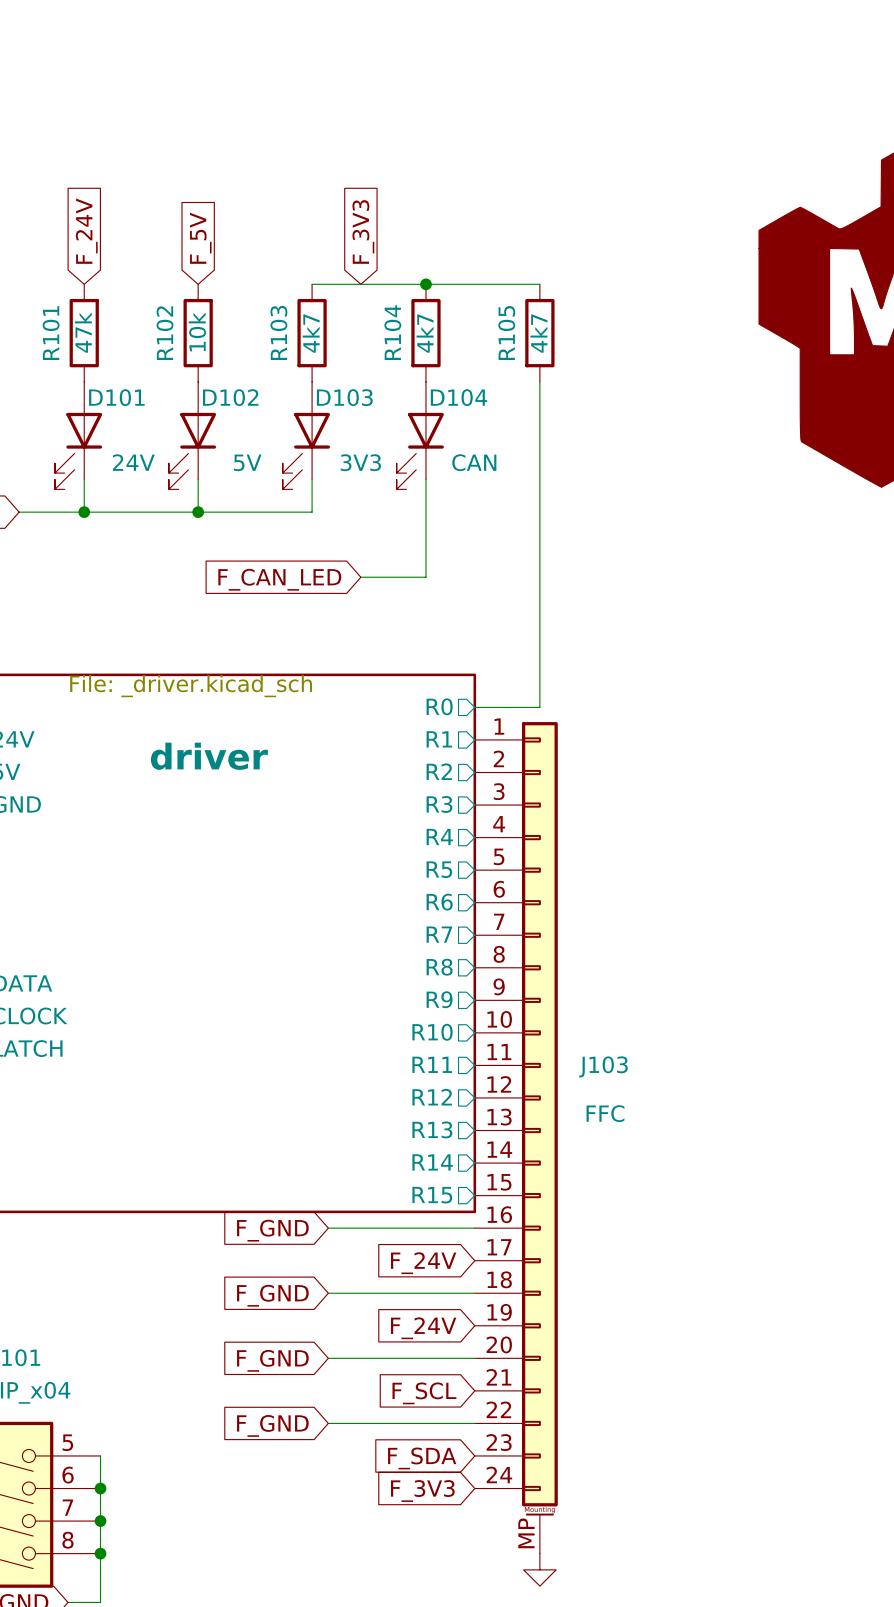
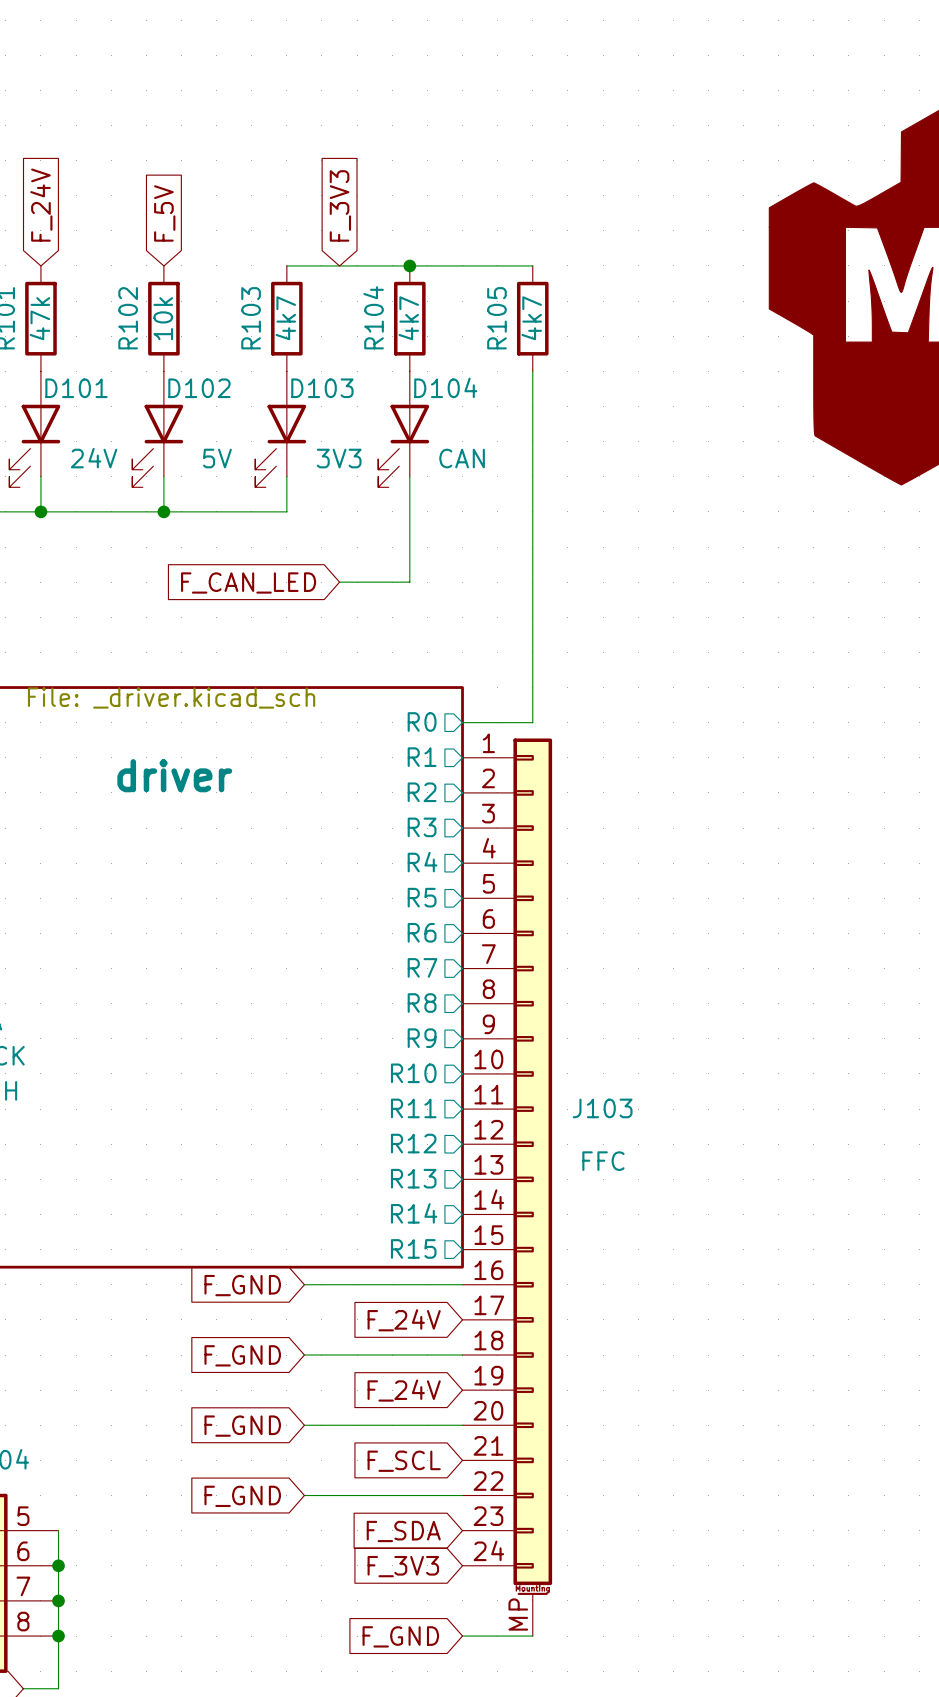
wire: none -> (462, 1636) (532, 1636)
global label: none -> F_GND (400, 1636)
power symbol: (539, 1569) -> none

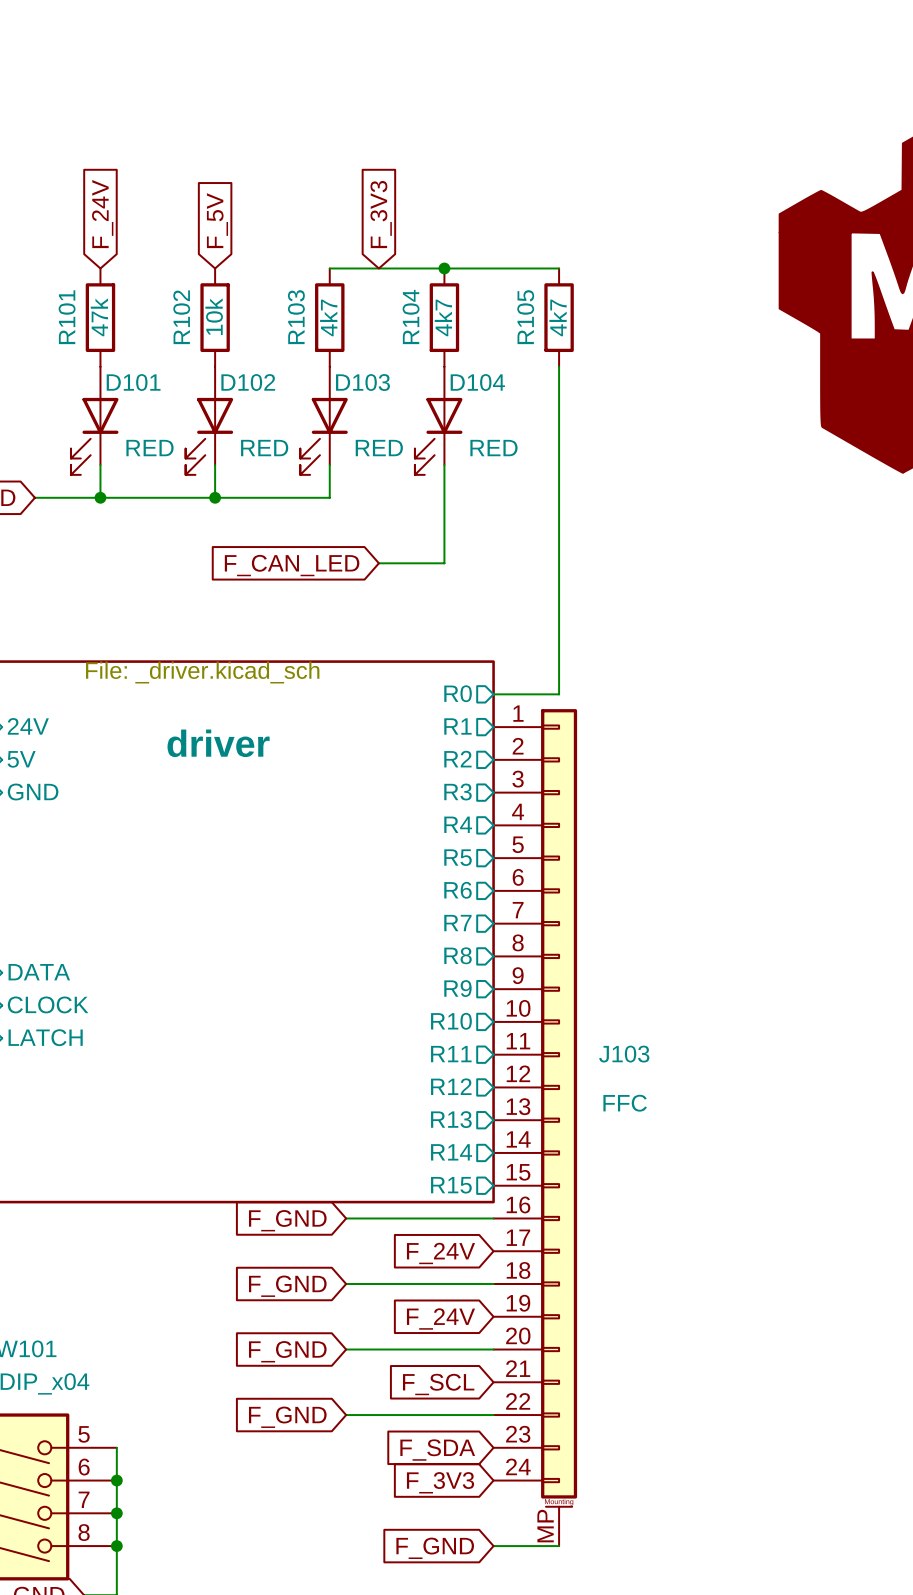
D101 value: 24V (94, 458) -> RED (150, 448)
D102 value: 5V (217, 458) -> RED (264, 448)
D103 value: 3V3 (339, 458) -> RED (379, 448)
D104 value: CAN (462, 458) -> RED (493, 448)

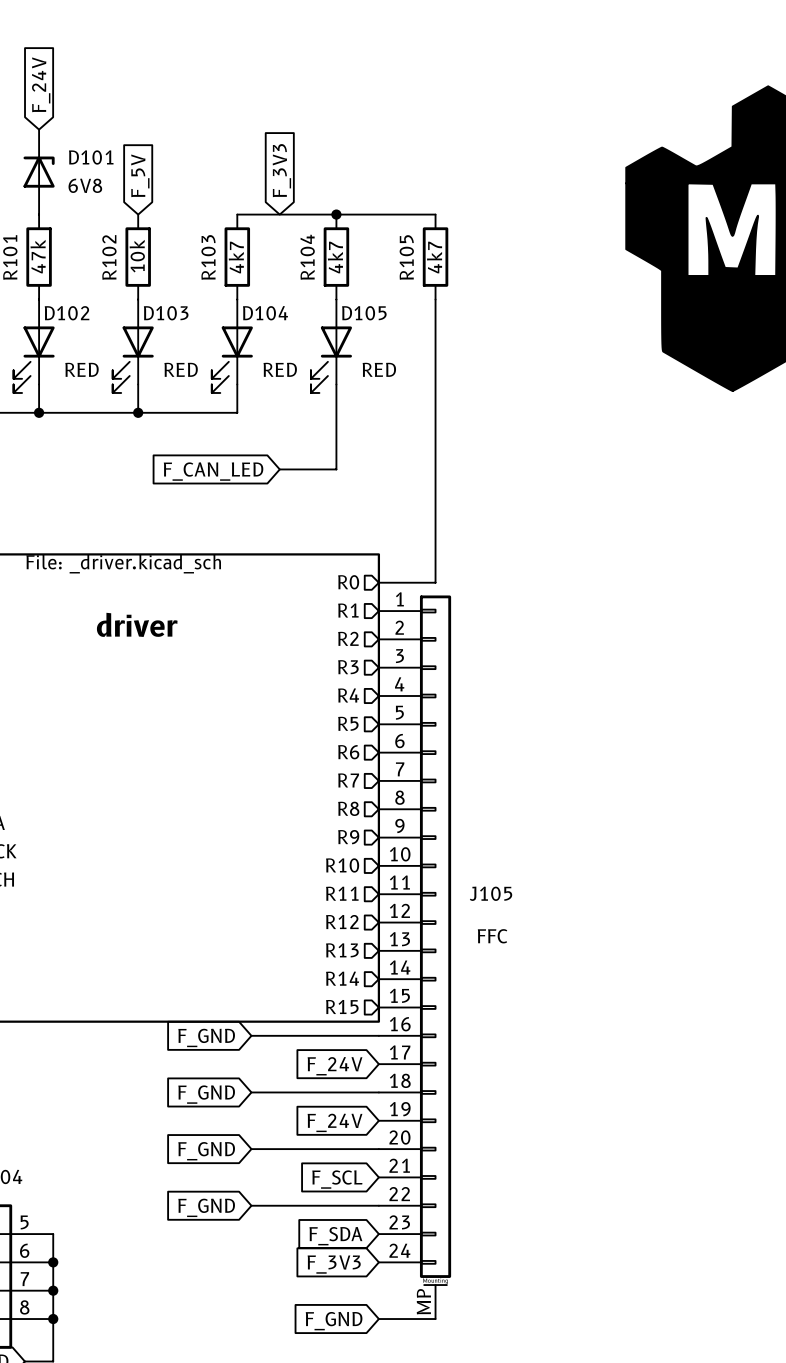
global label position: F_24V (102, 214) -> F_24V (41, 84)
D101: none -> 6V8 (39, 172)
D101 name: D101 (133, 382) -> D102 (67, 313)
D102 name: D102 (248, 382) -> D103 (166, 313)
D103 name: D103 (362, 382) -> D104 (265, 313)
D104 name: D104 (477, 382) -> D105 (364, 313)
J103 name: J103 (624, 1054) -> J105 (491, 893)

